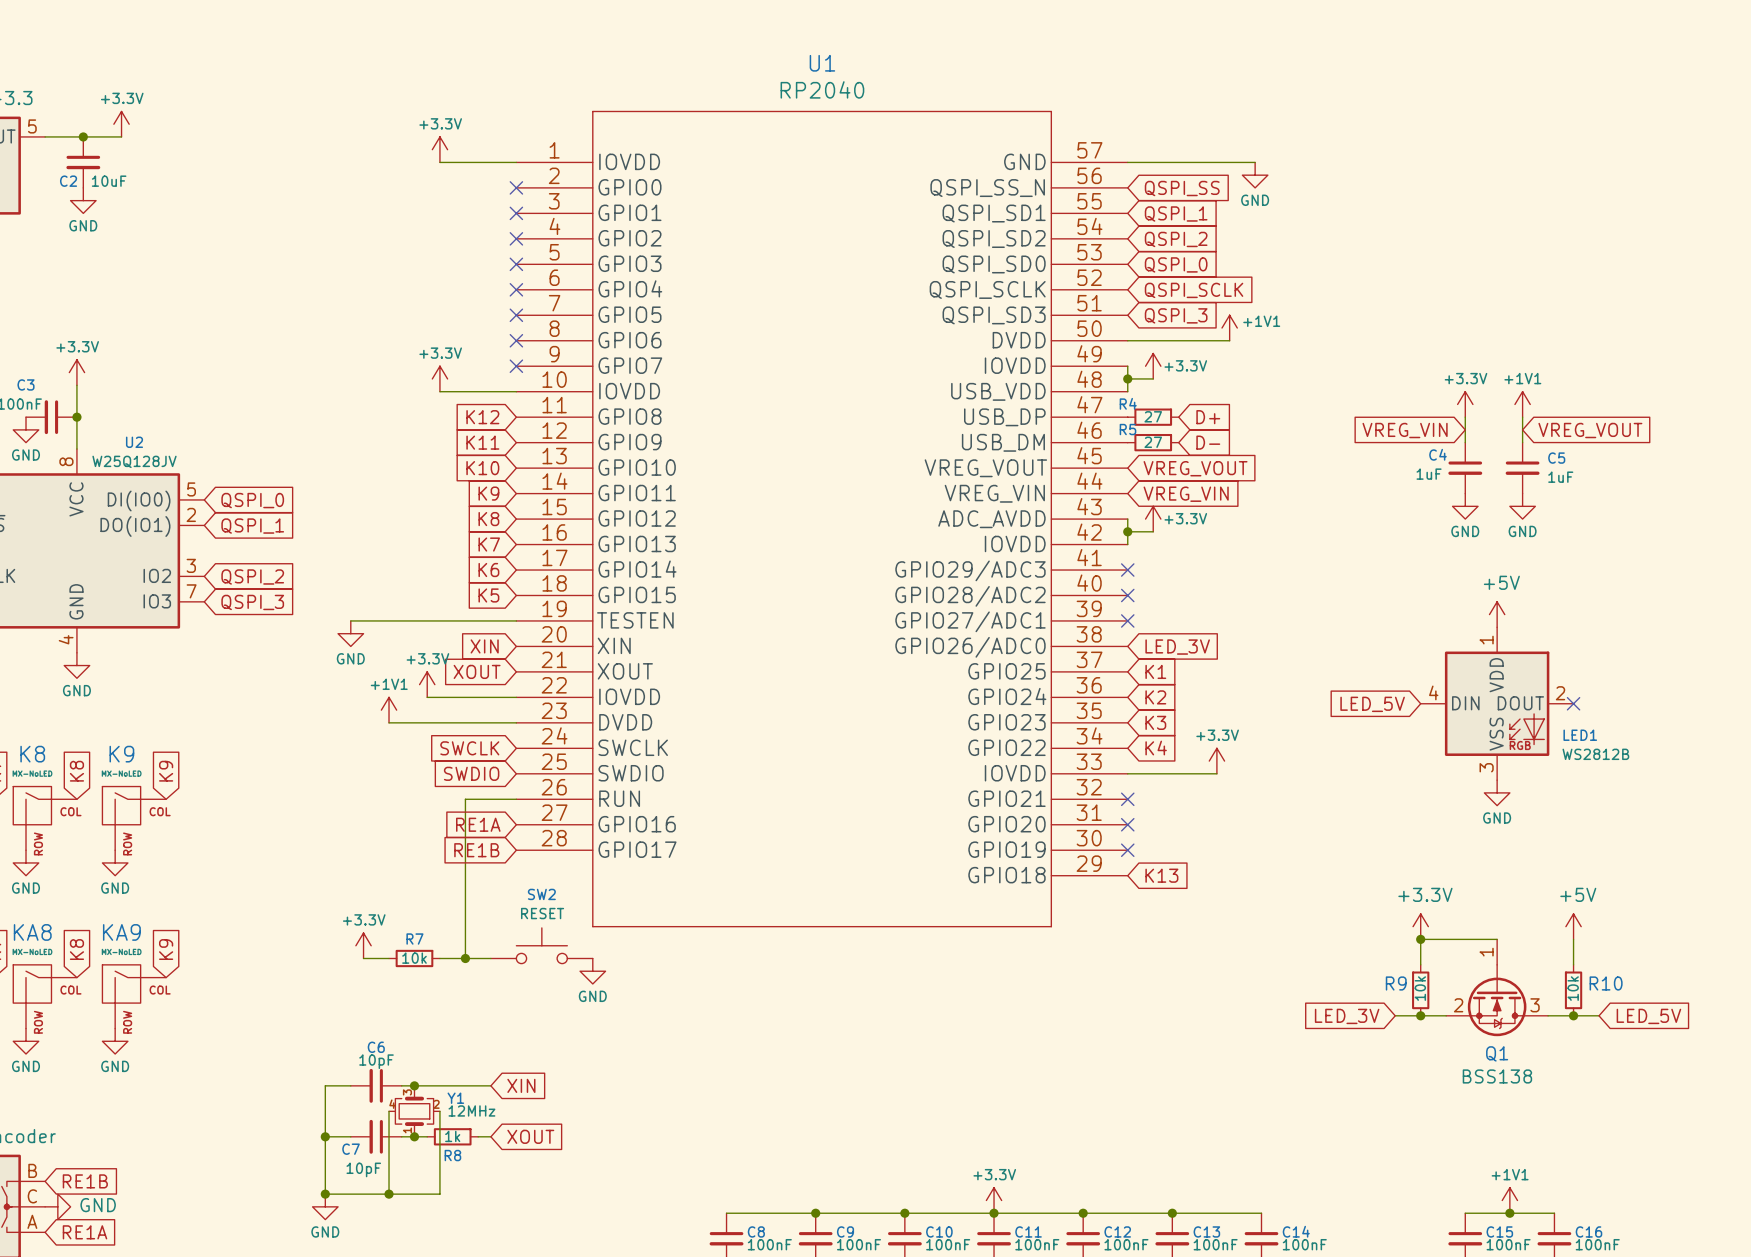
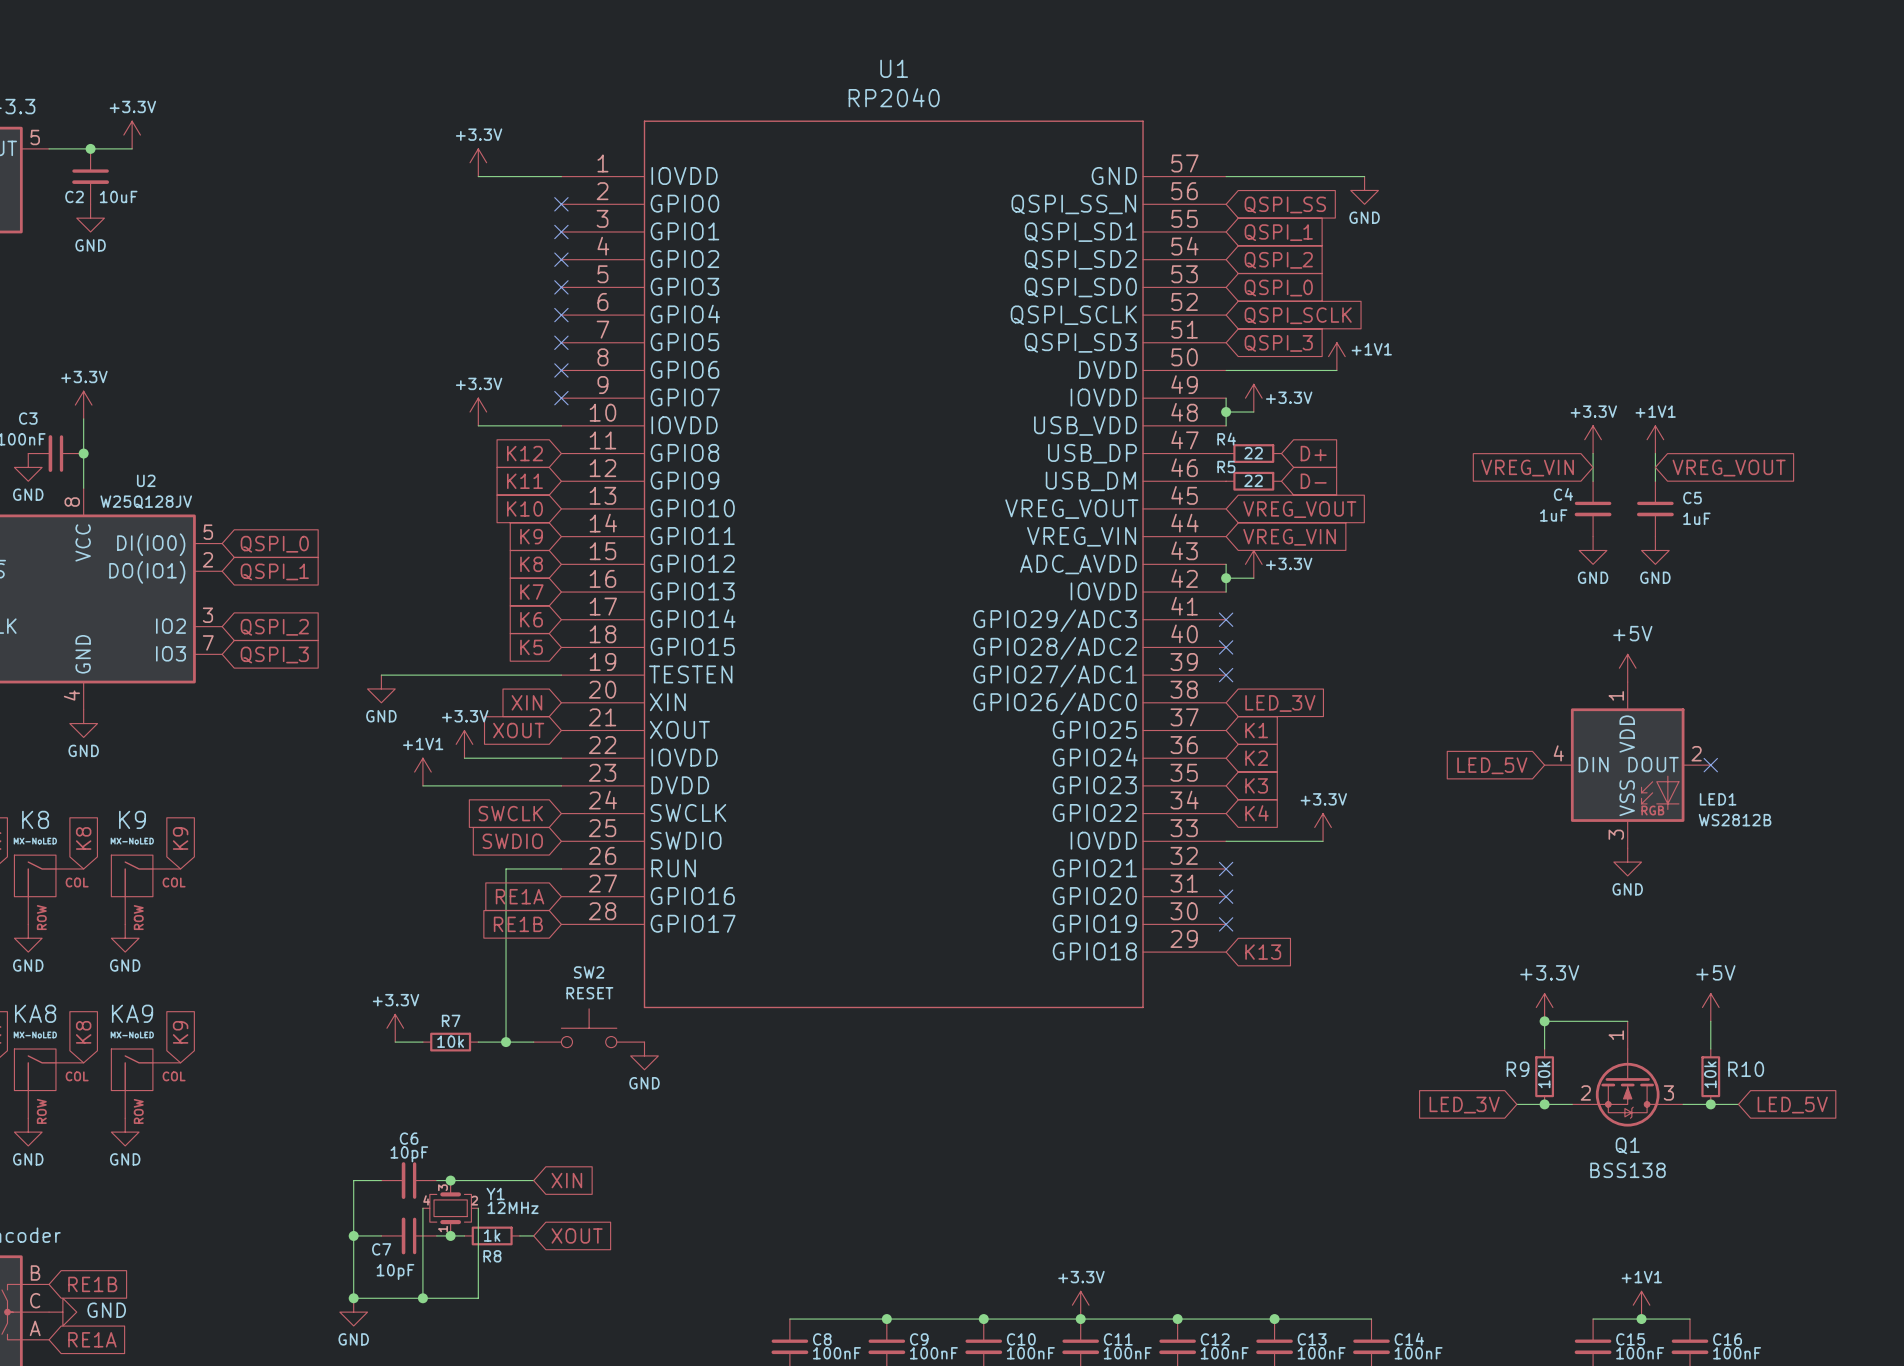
R4 value: 27 (1153, 416) -> 22 (1253, 453)
R5 value: 27 (1153, 442) -> 22 (1253, 480)

